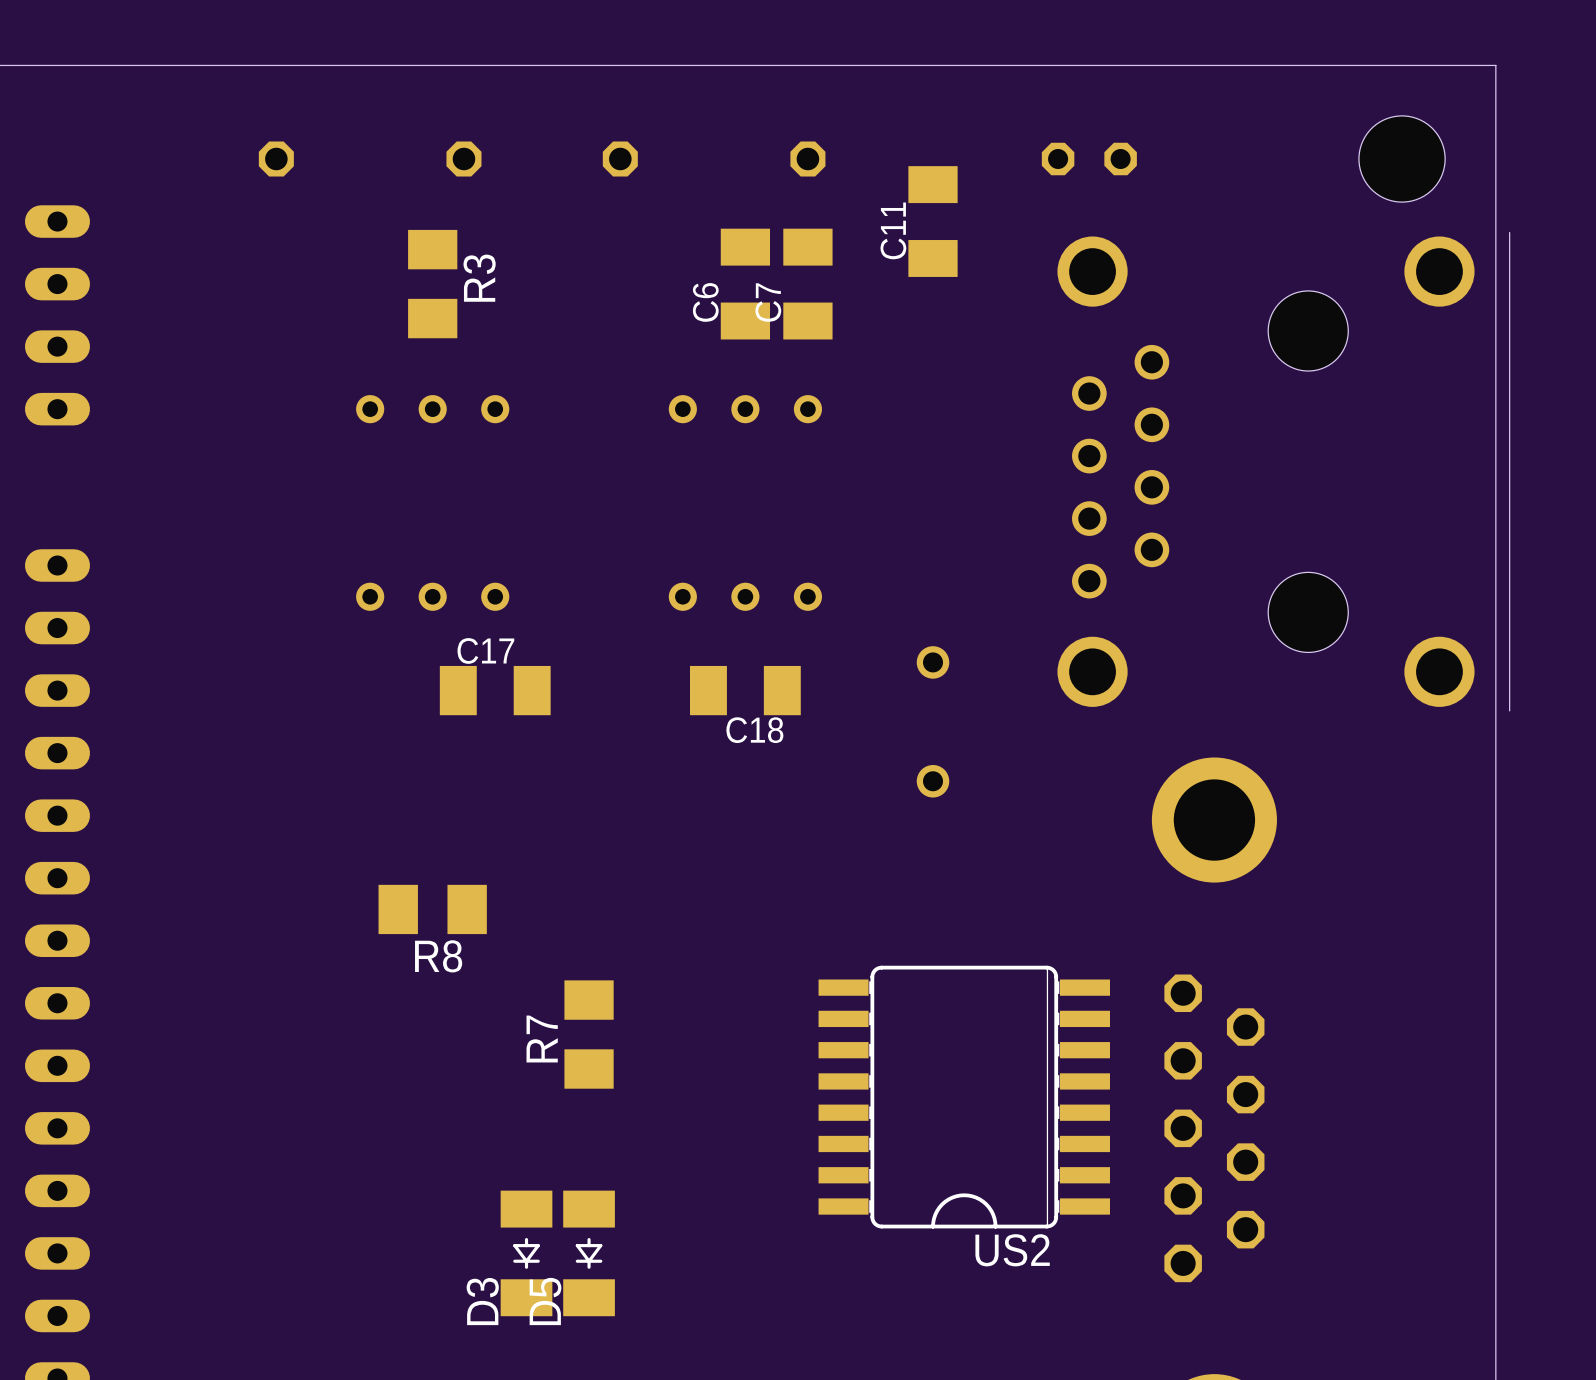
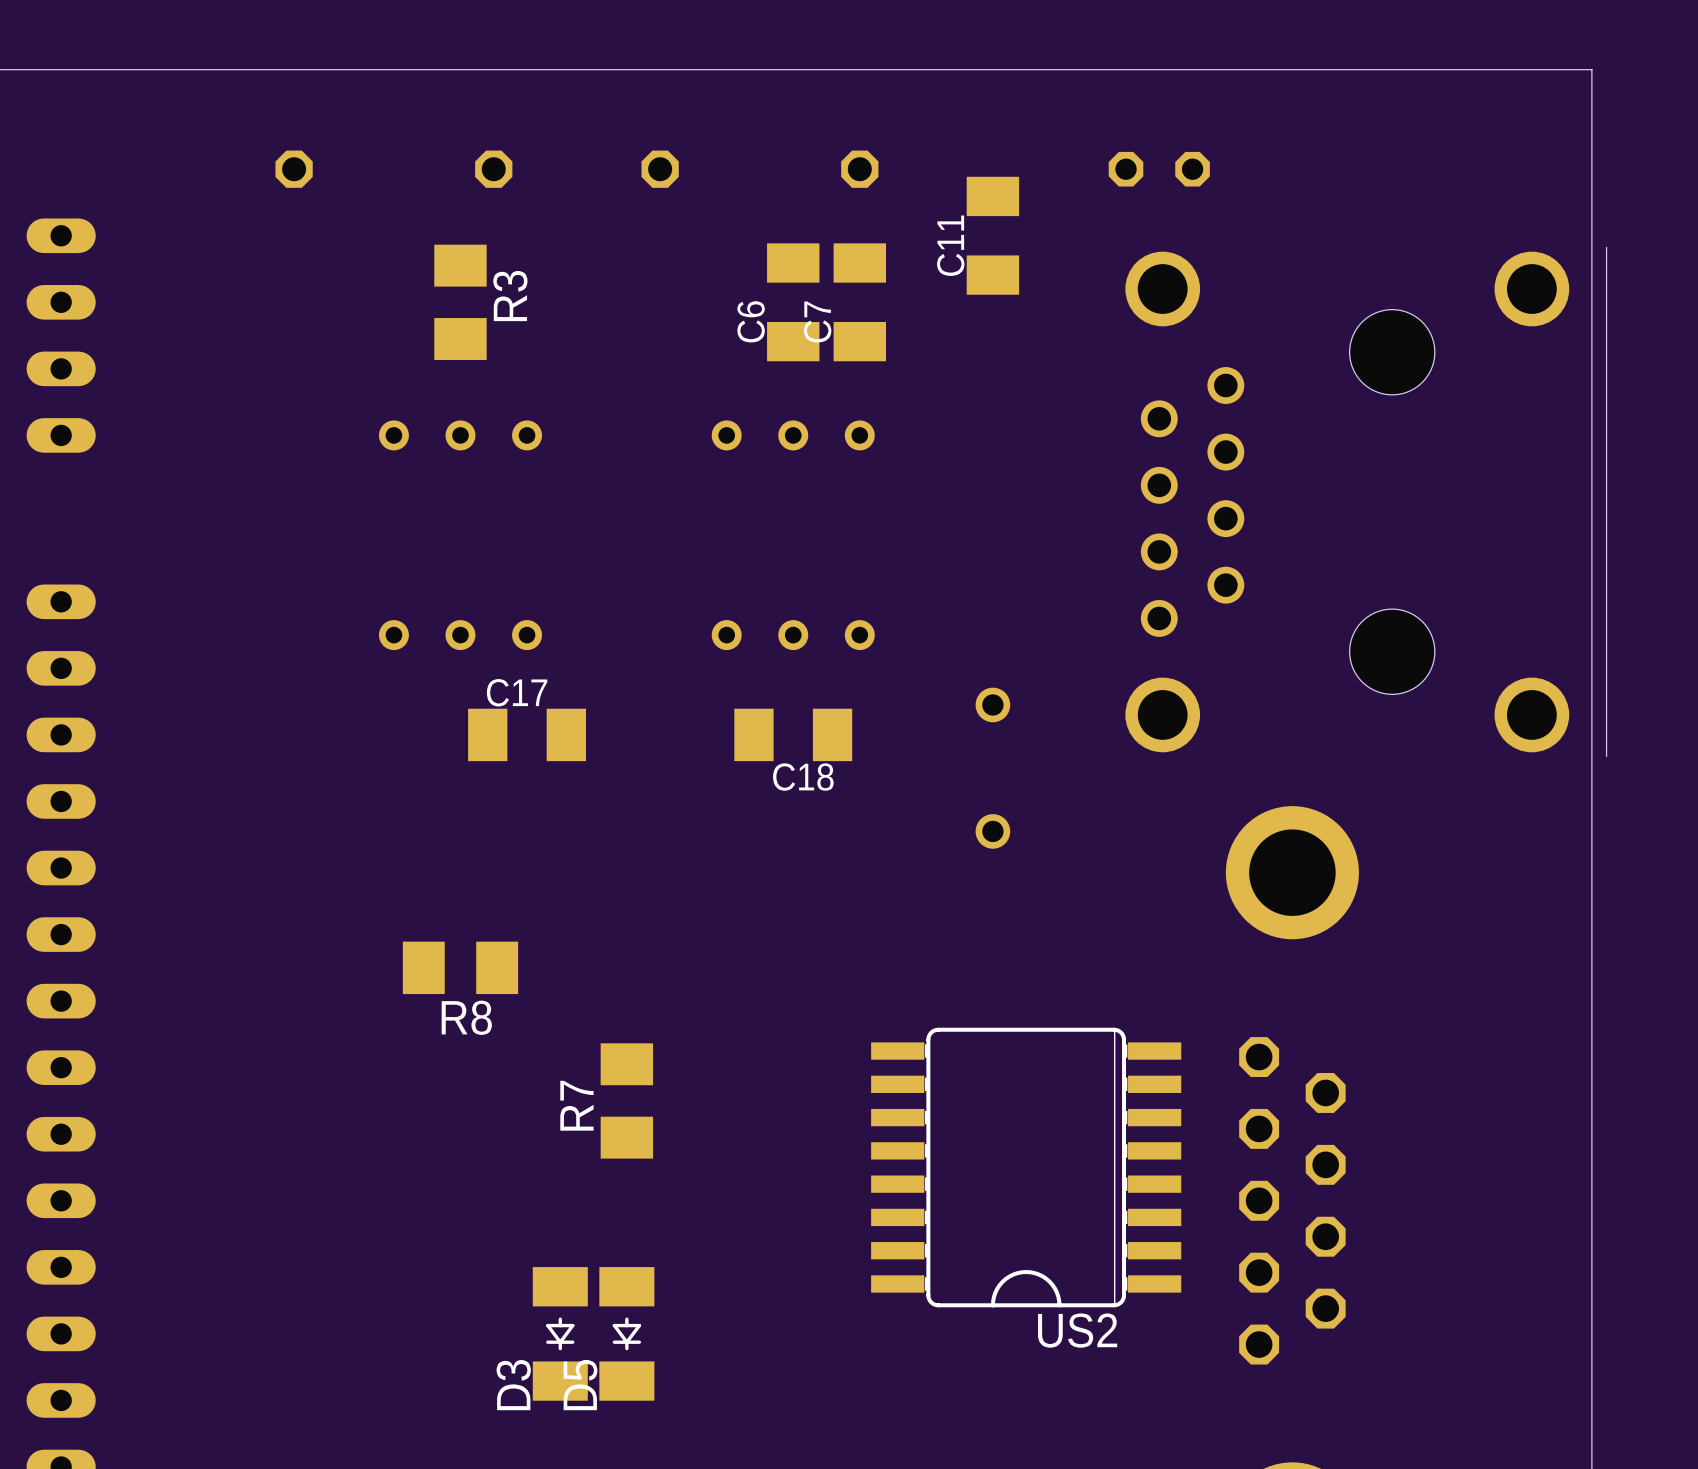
hole: (1402, 159) -> none

